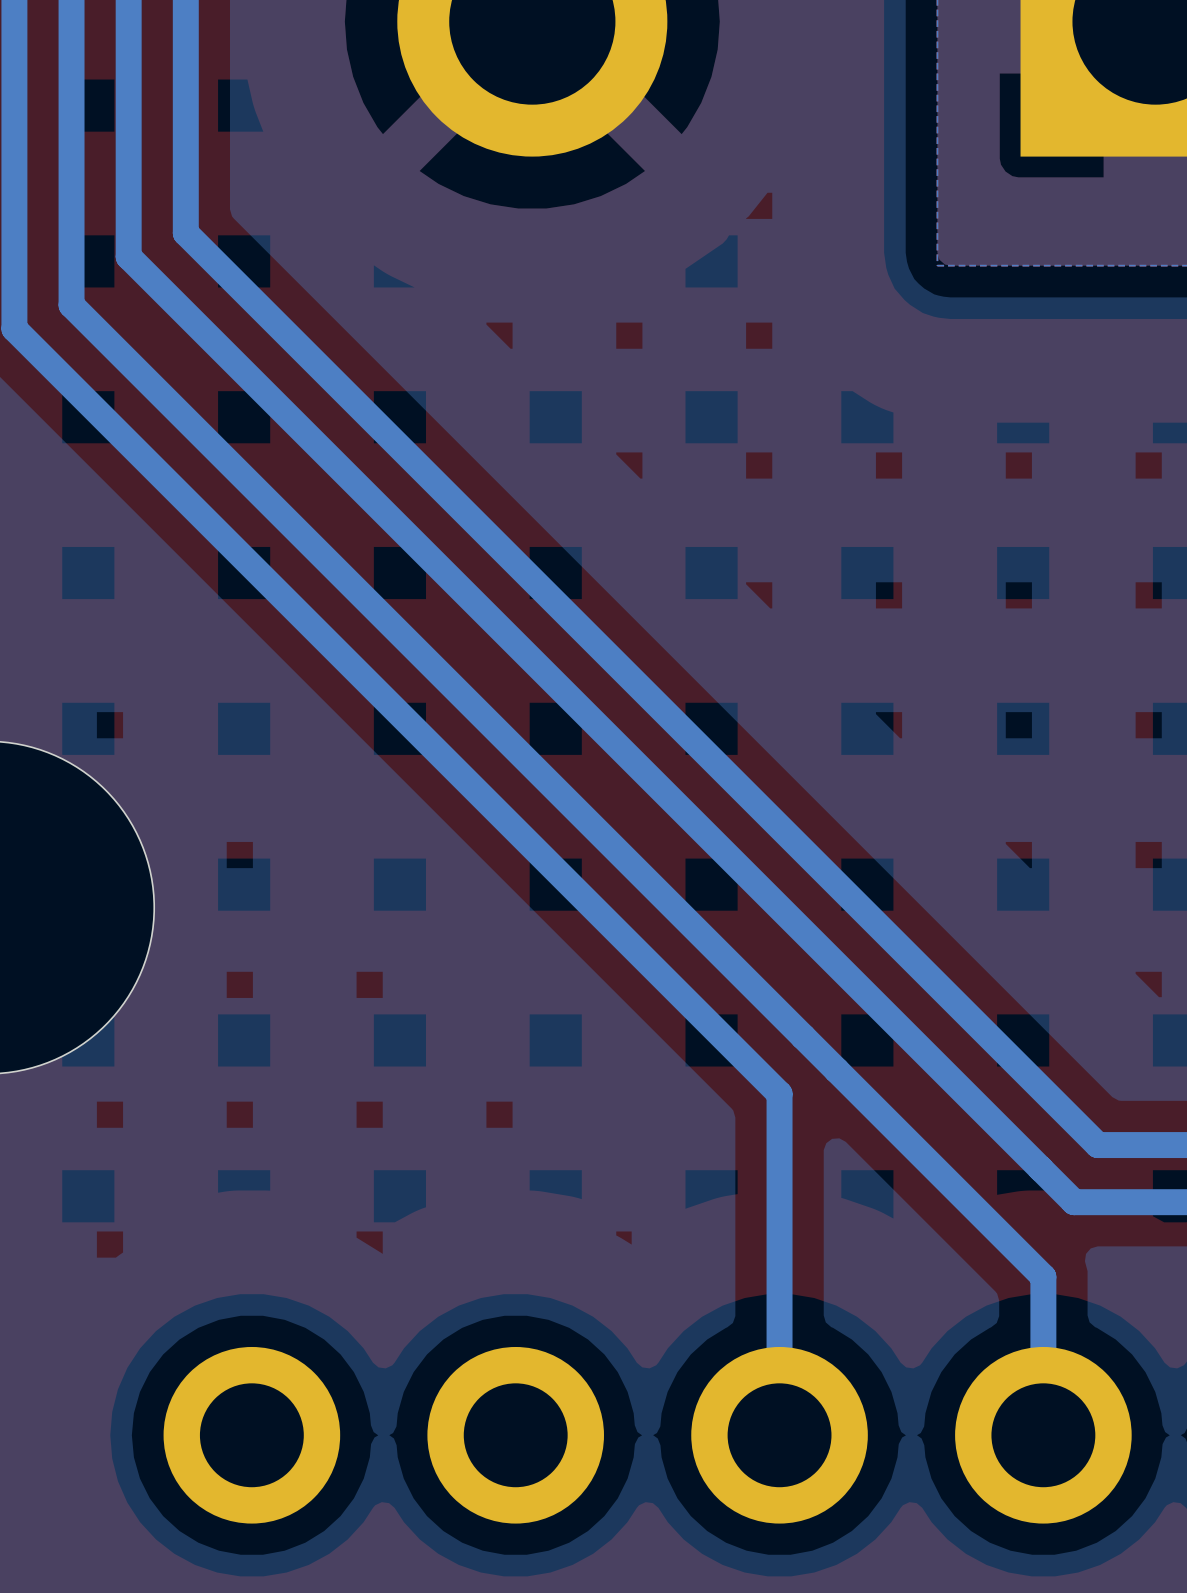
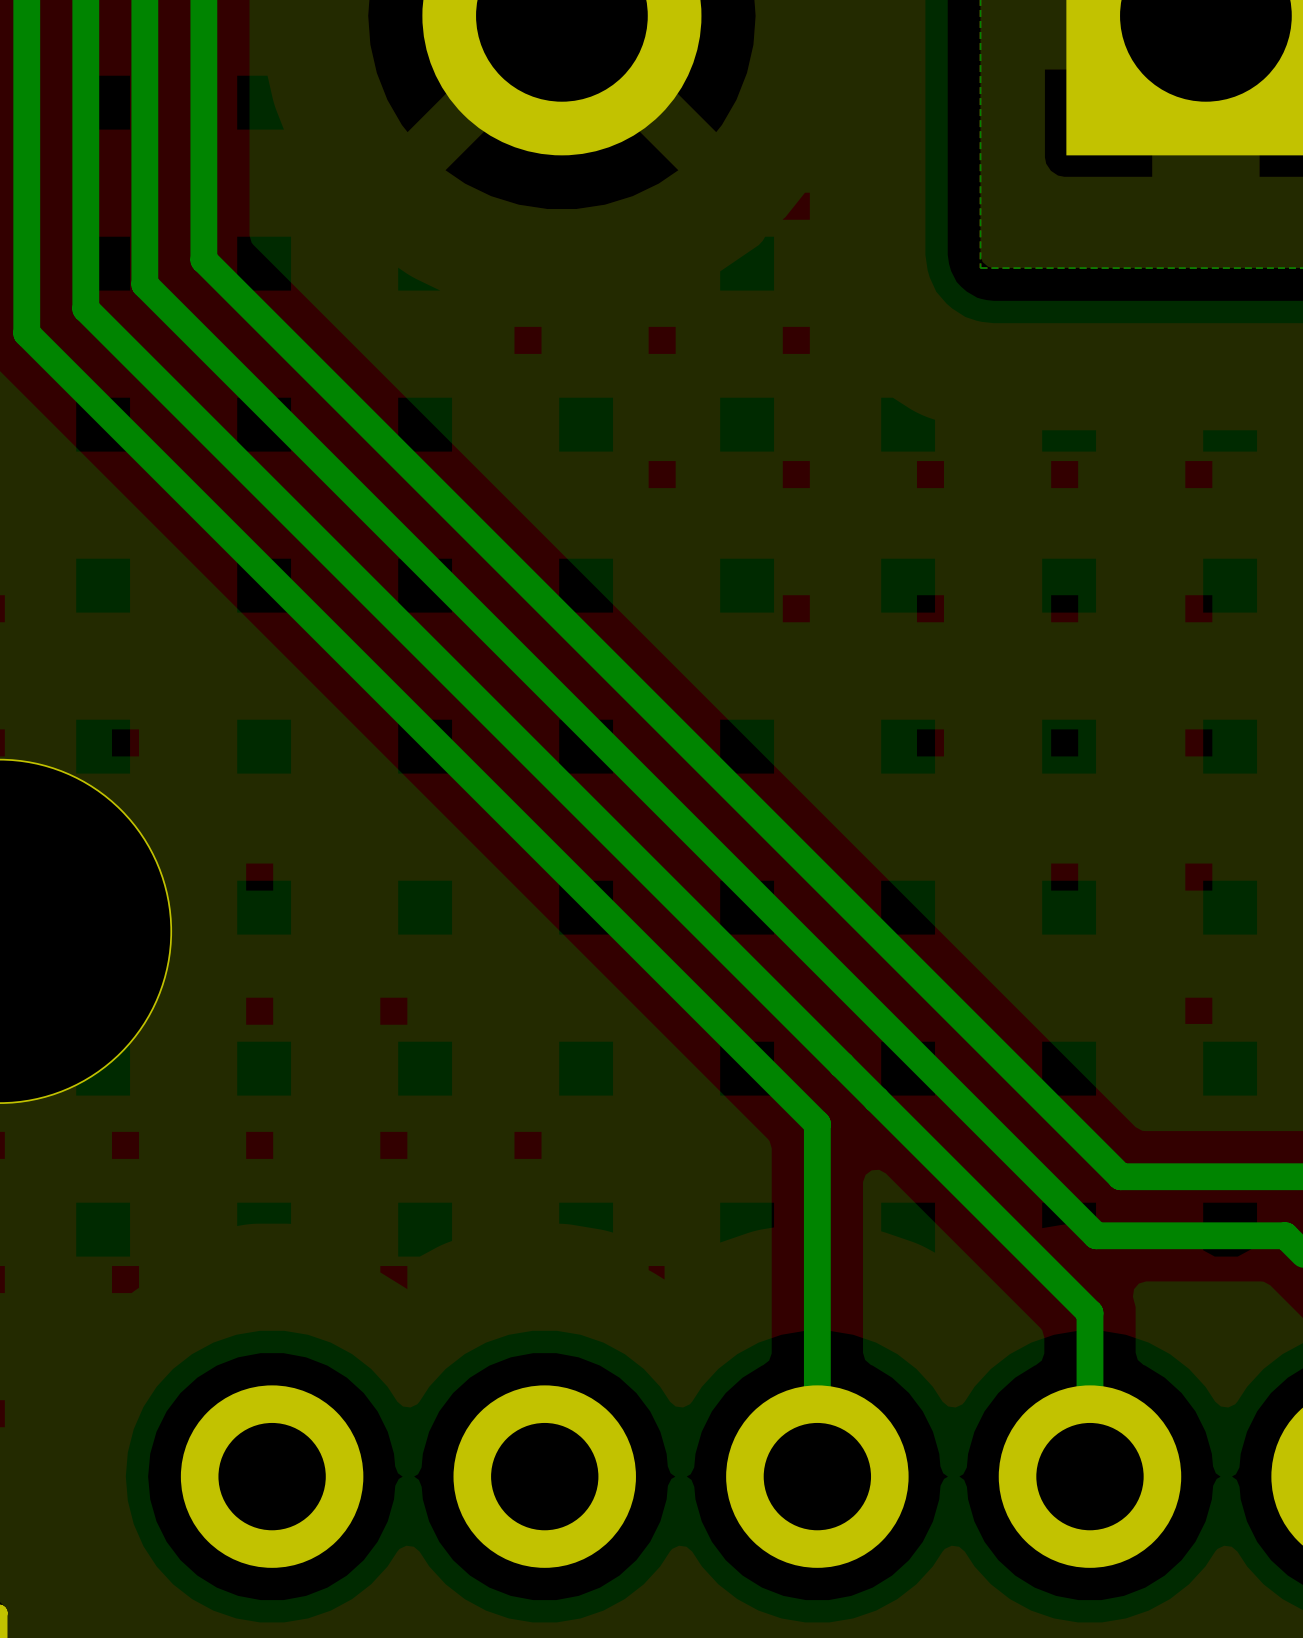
bottom track: (185, 233) (1097, 1145) -> (203, 234) (203, 259) (1120, 1176) (1146, 1176)
bottom track: (128, 256) (1074, 1202) -> (144, 258) (144, 284) (1096, 1235) (1121, 1235)

